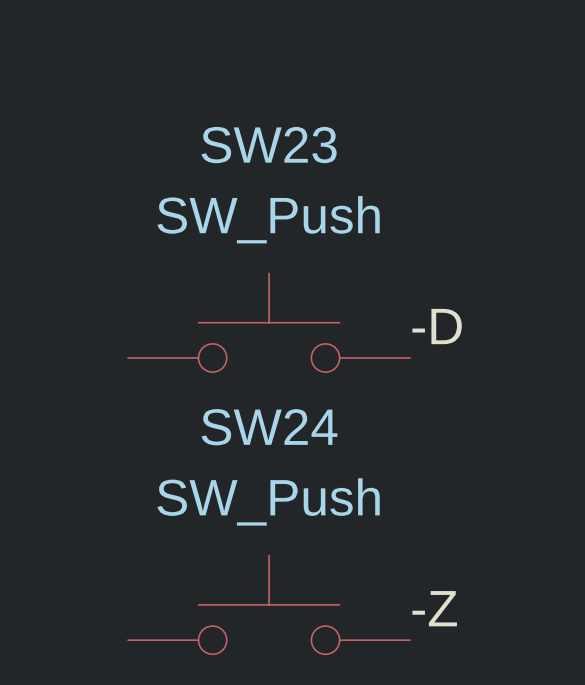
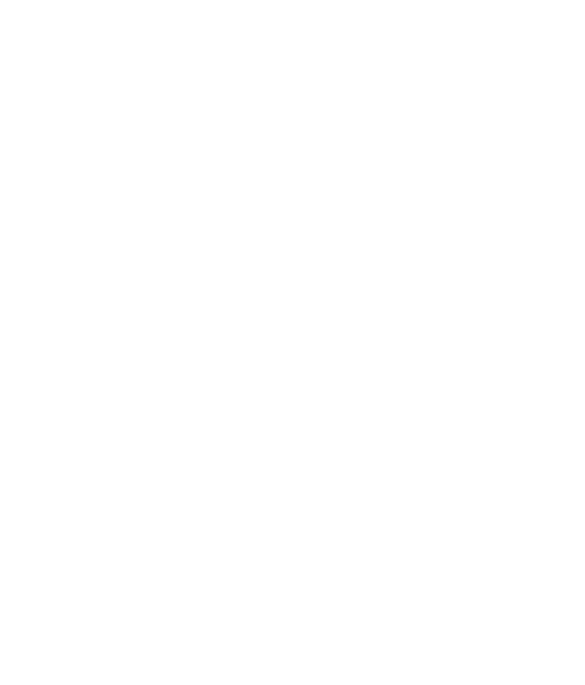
SW23: SW_Push (269, 322) -> none
label: -D (437, 326) -> none
SW24: SW_Push (269, 604) -> none
label: -Z (434, 608) -> none

